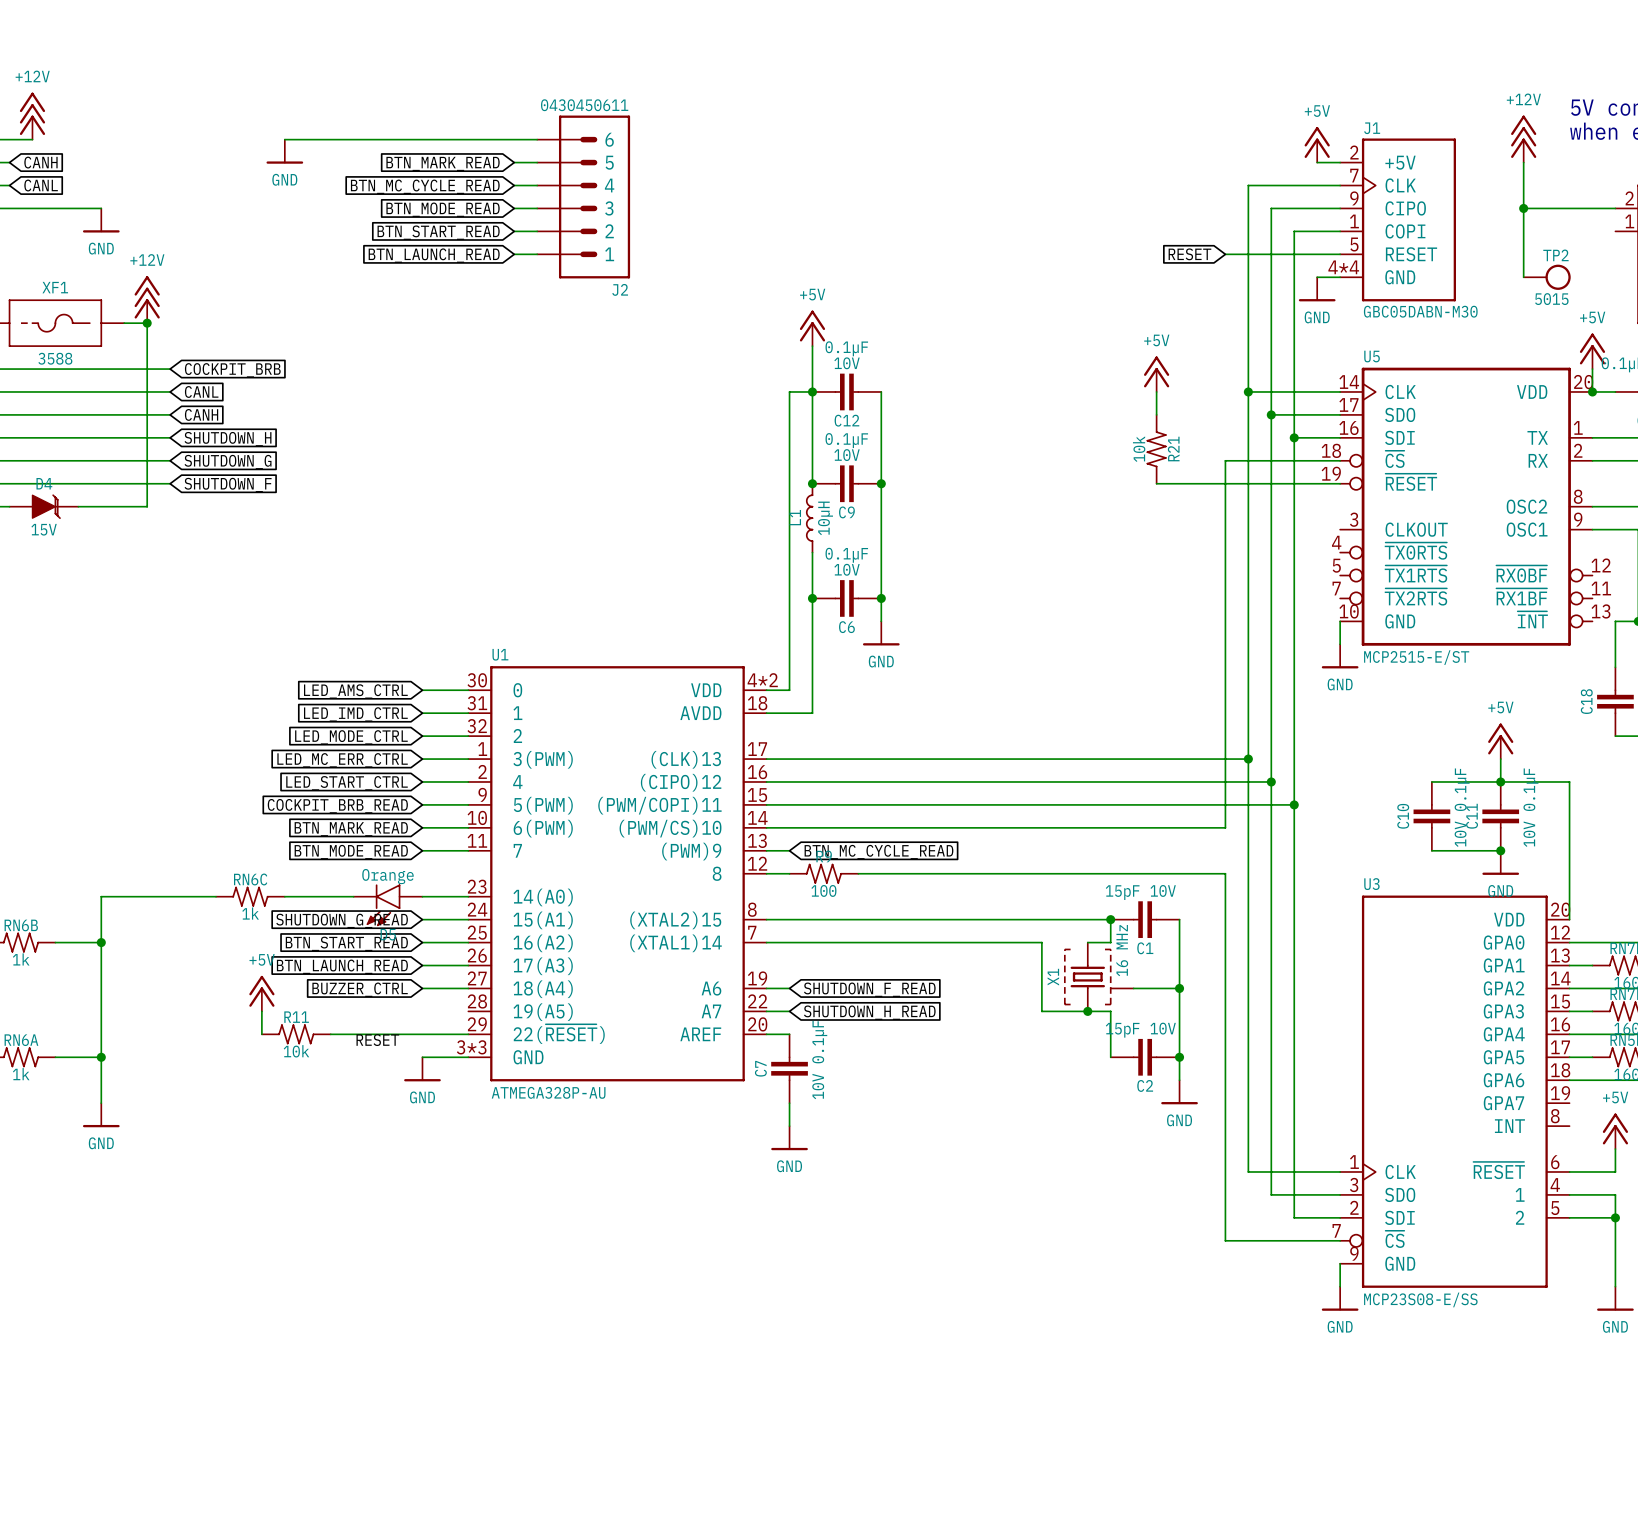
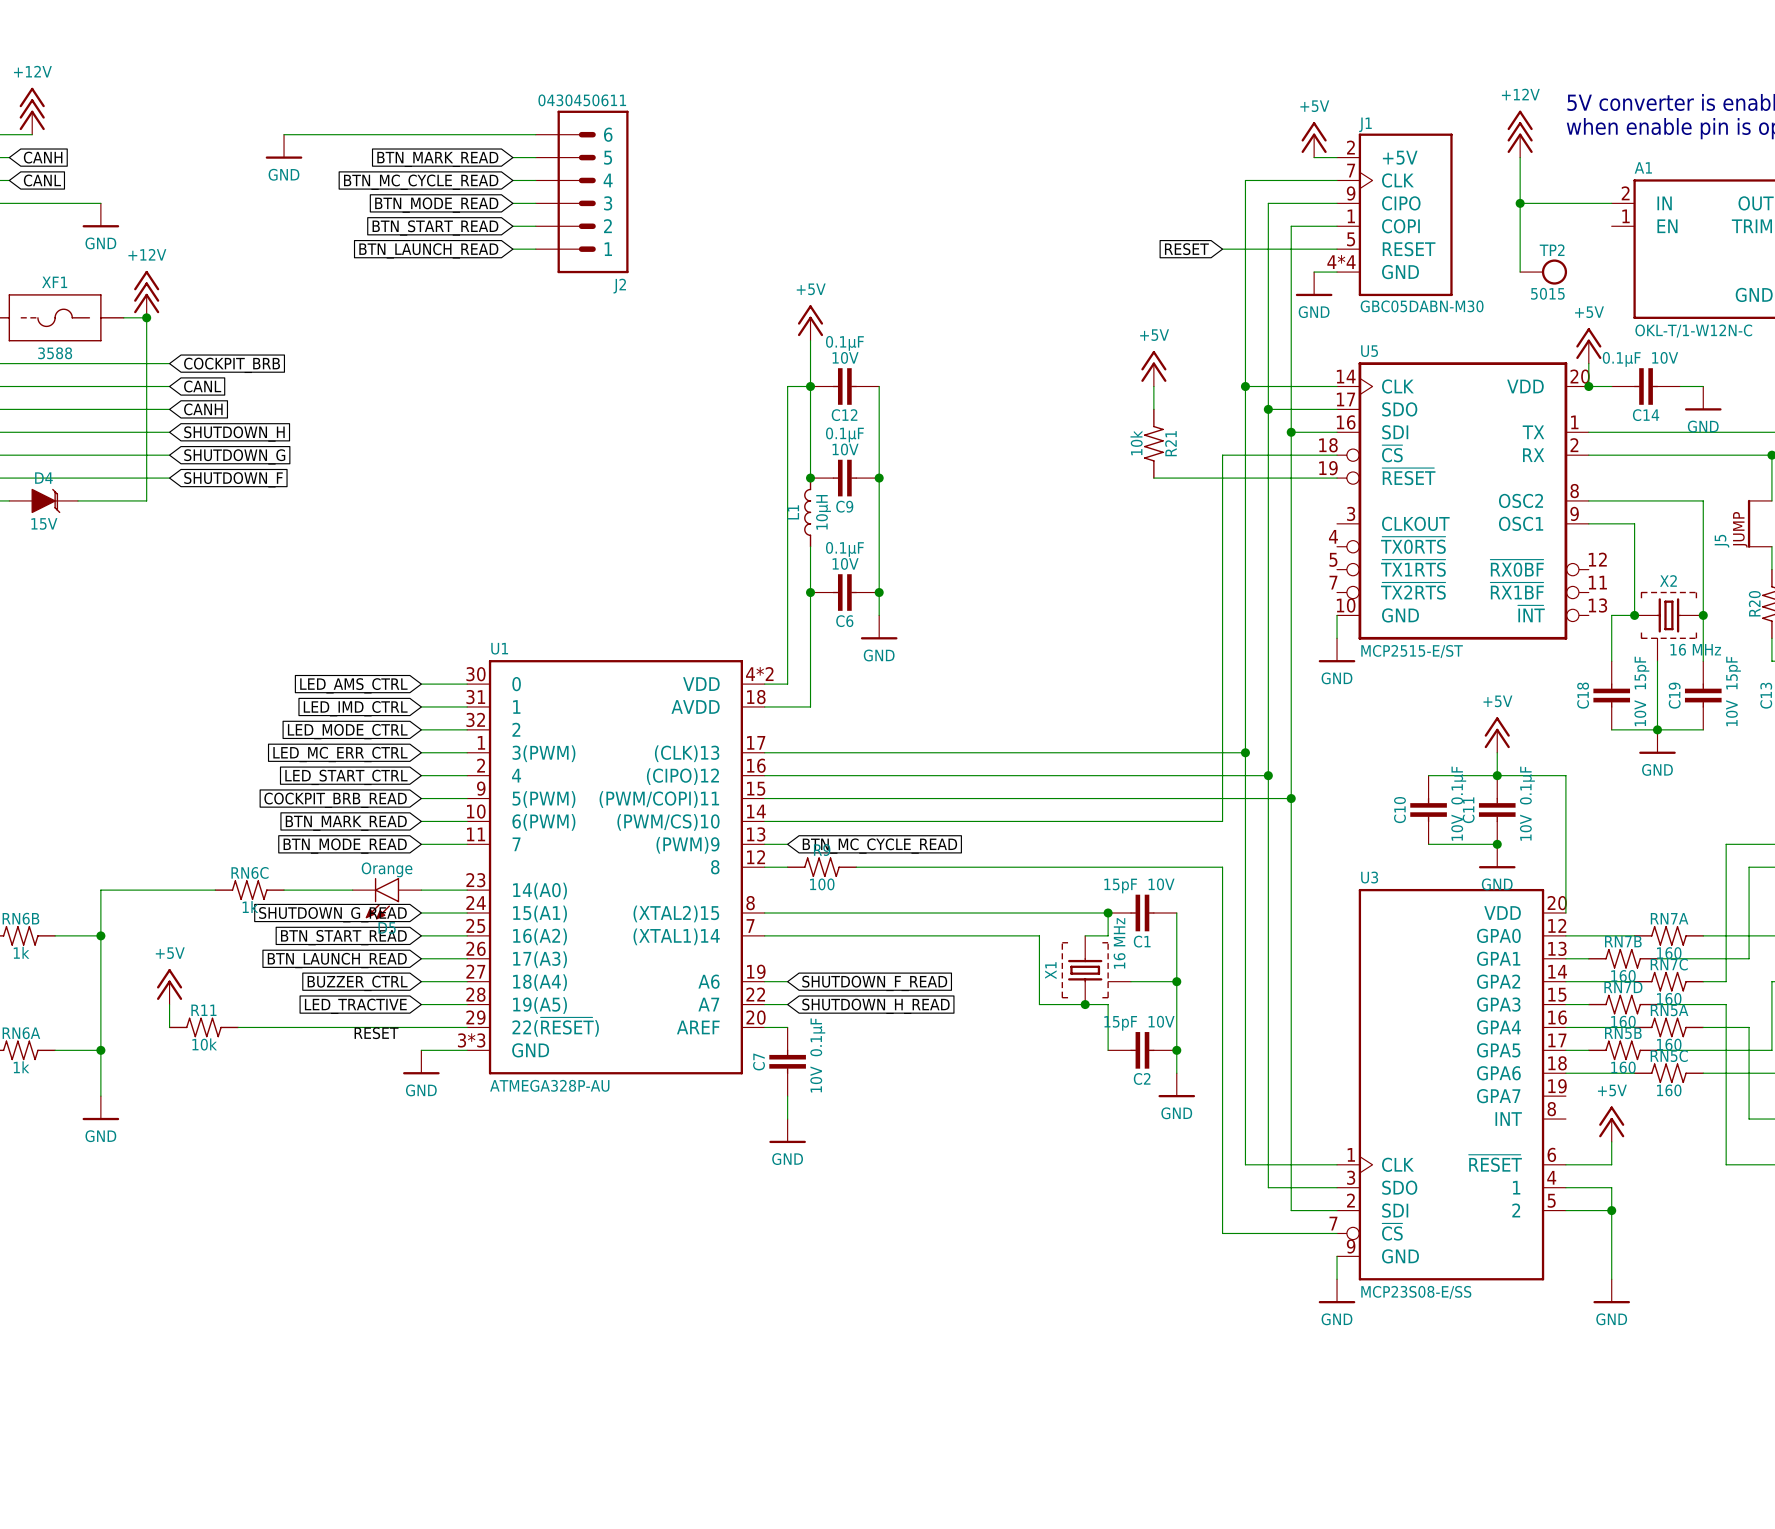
power symbol position: +5V (261, 993) -> +5V (169, 986)
wire: (261, 1011) (261, 1034) -> (169, 1004) (169, 1027)
wire: none -> (421, 1004) (467, 1004)
global label: none -> LED_TRACTIVE (355, 1006)
wire: none -> (238, 1027) (329, 1027)
R11 position: (296, 1034) -> (203, 1027)

